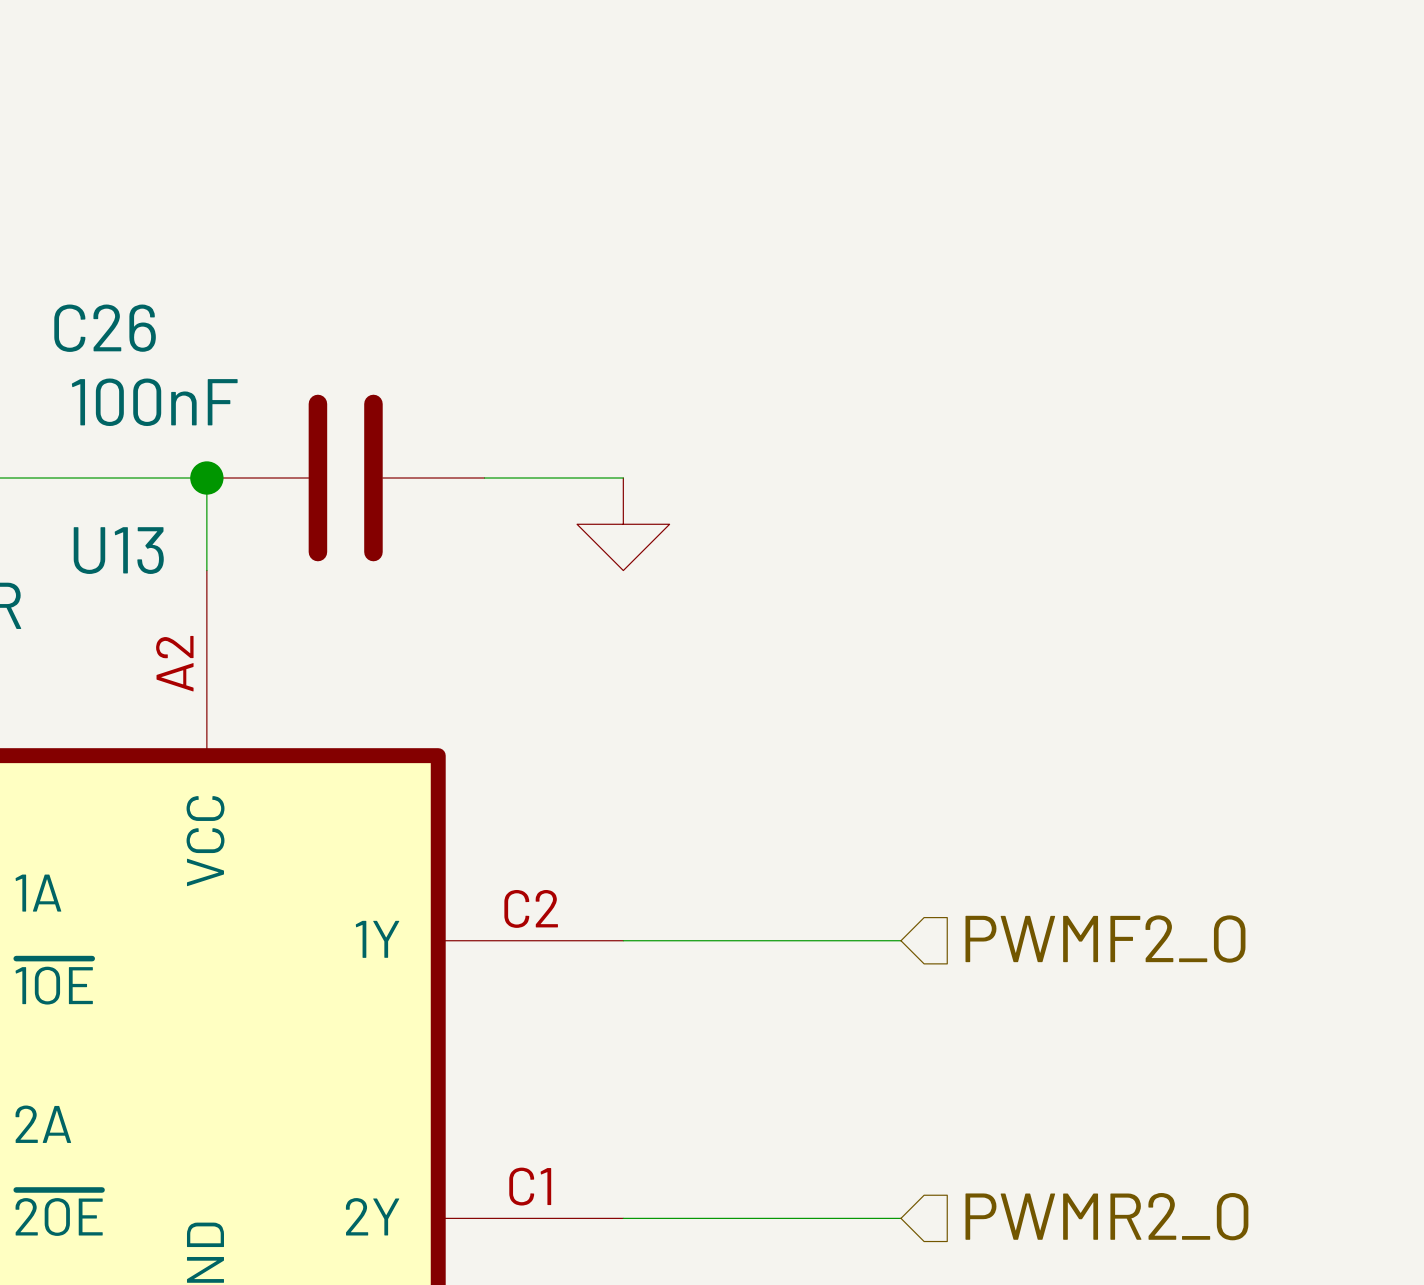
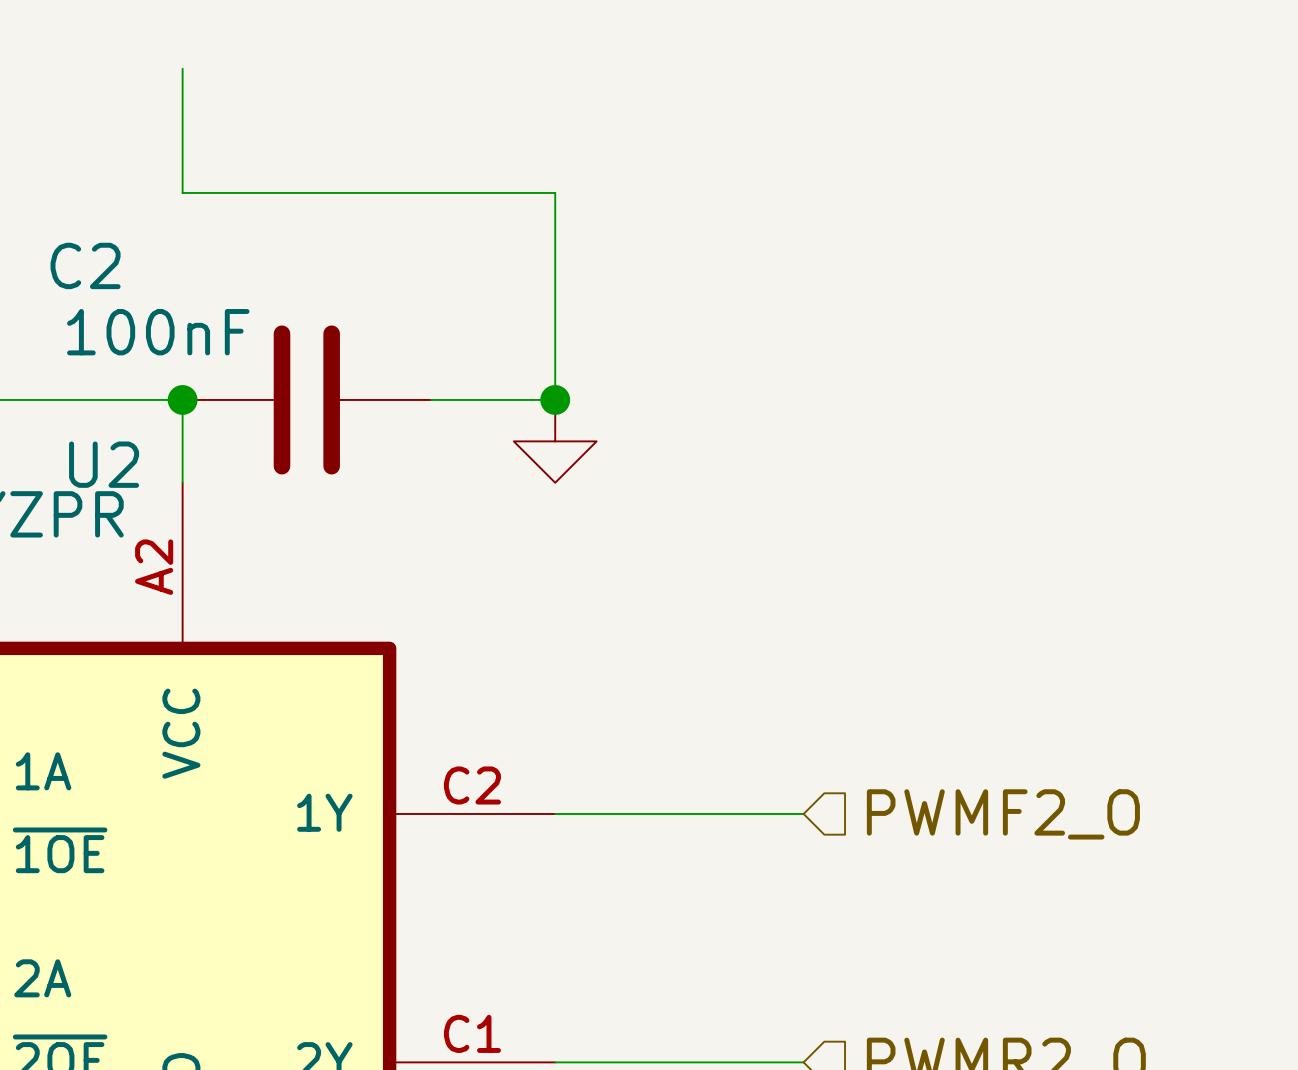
wire: none -> (182, 68) (182, 192) (555, 192) (555, 399)
C26 name: C26 (105, 328) -> C2 (85, 265)
junction: none -> (555, 399)
U13 name: U13 (118, 550) -> U2 (104, 464)

